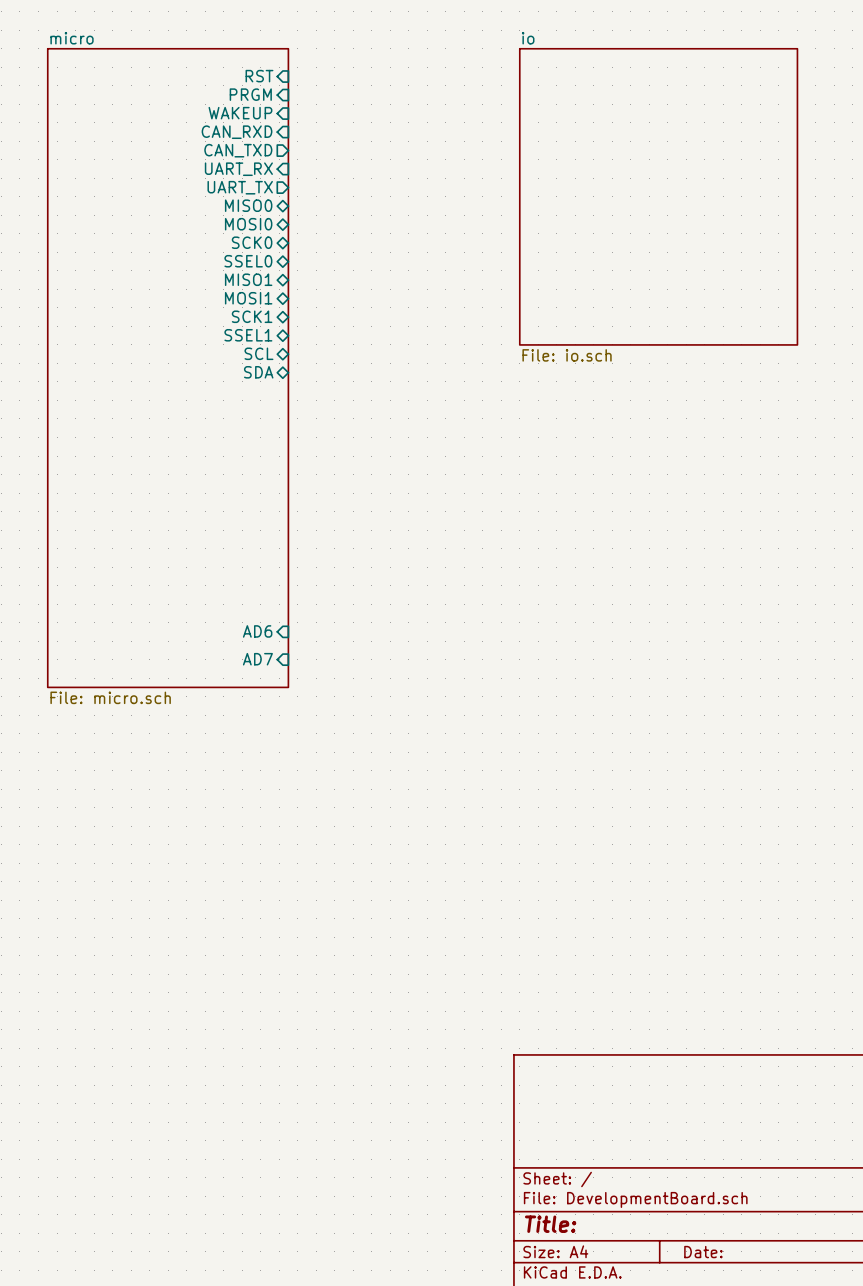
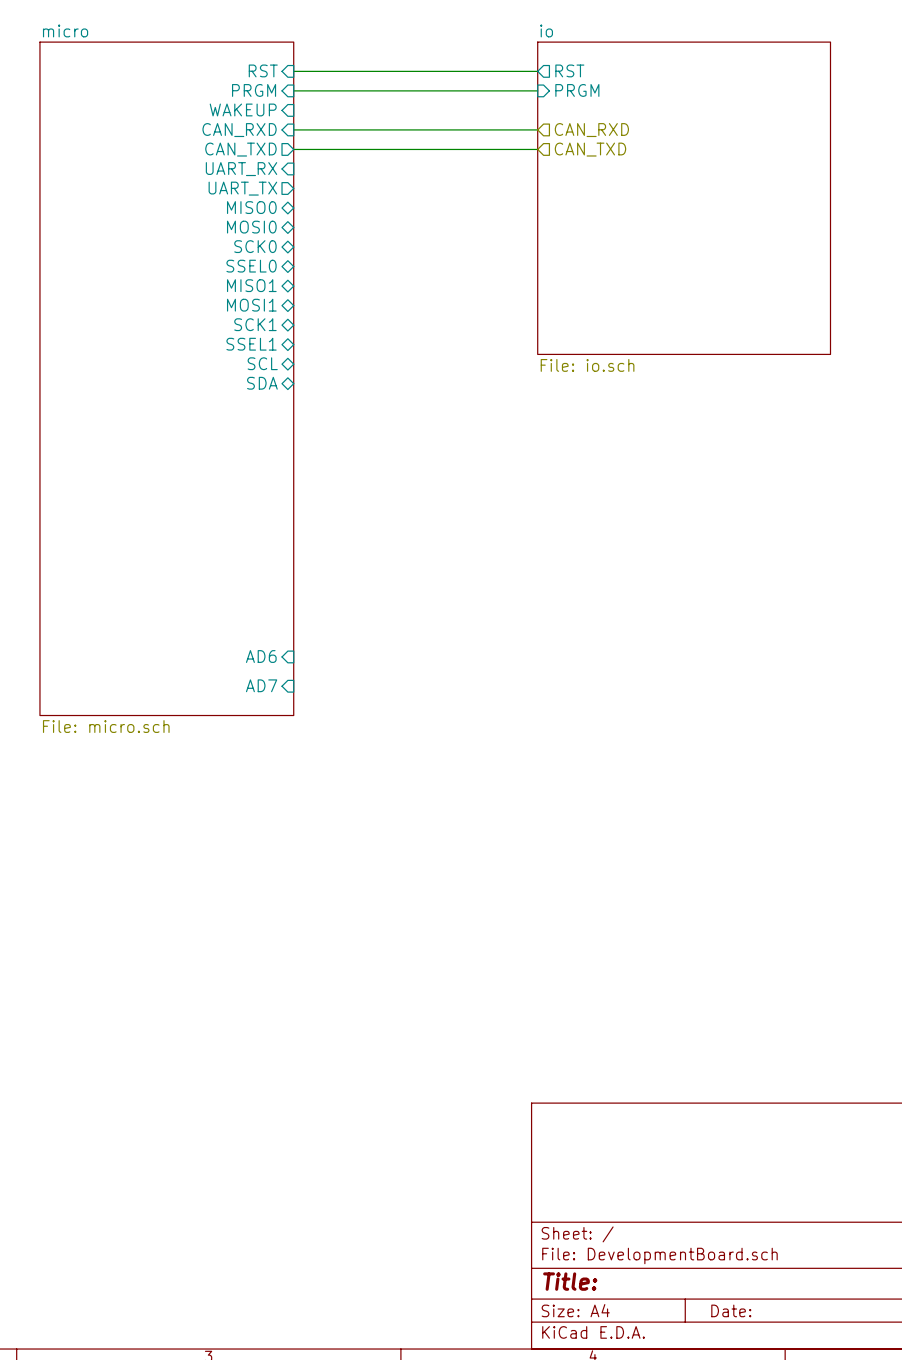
wire: none -> (293, 71) (537, 71)
sheet pin: none -> RST (569, 70)
sheet pin: none -> PRGM (577, 90)
wire: none -> (293, 90) (537, 90)
wire: none -> (293, 129) (537, 129)
hierarchical label: none -> CAN_RXD (591, 130)
wire: none -> (293, 149) (537, 149)
hierarchical label: none -> CAN_TXD (590, 149)

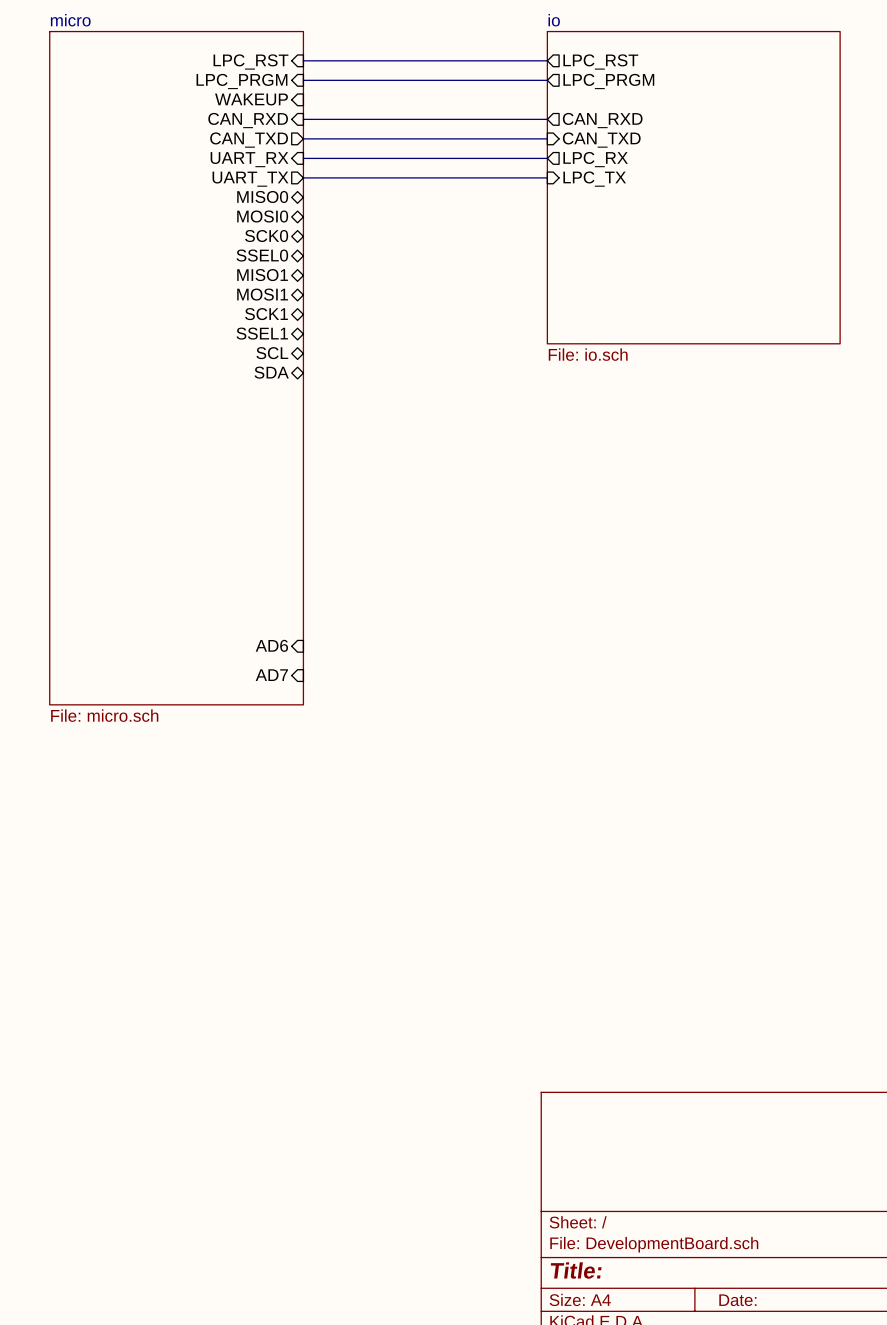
sheet pin: RST (263, 70) -> LPC_RST (250, 61)
sheet pin: RST (569, 70) -> LPC_RST (600, 61)
sheet pin: PRGM (254, 90) -> LPC_PRGM (241, 81)
sheet pin shape: input (577, 90) -> output (608, 81)
sheet pin: PRGM (577, 90) -> LPC_PRGM (608, 81)
sheet pin: none -> CAN_RXD (602, 120)
hierarchical label: CAN_RXD (591, 130) -> none
sheet pin: none -> CAN_TXD (601, 140)
hierarchical label: CAN_TXD (590, 149) -> none
wire: none -> (303, 158) (547, 158)
sheet pin: none -> LPC_RX (595, 159)
wire: none -> (303, 177) (547, 177)
sheet pin: none -> LPC_TX (594, 179)

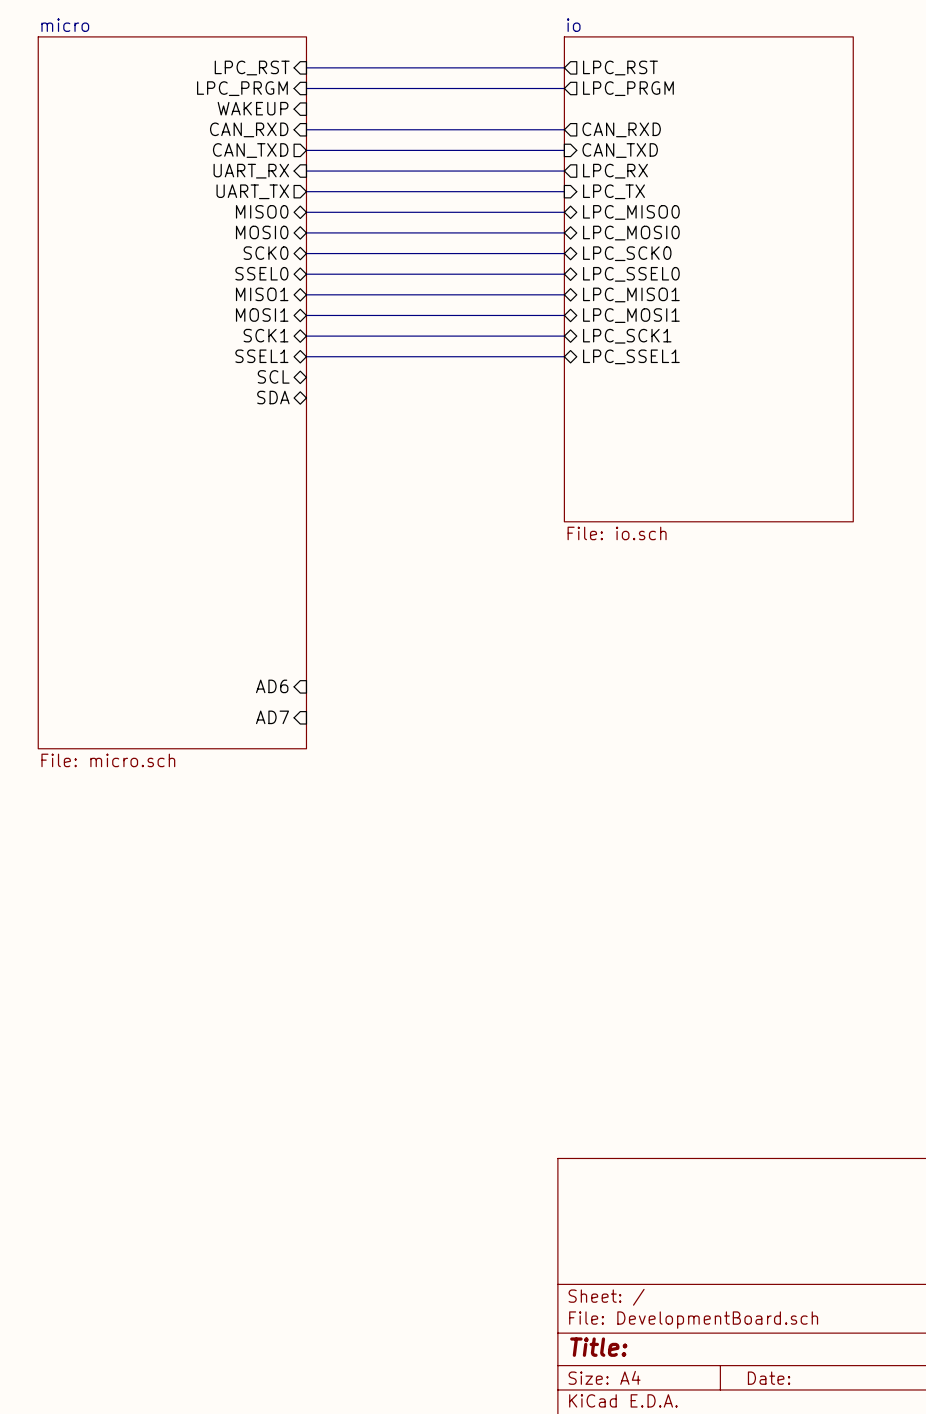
sheet io: File: io.sch (693, 187) -> none
wire: none -> (306, 212) (564, 212)
sheet pin: none -> LPC_MISO0 (631, 212)
wire: none -> (306, 232) (564, 232)
sheet pin: none -> LPC_MOSI0 (631, 233)
wire: none -> (306, 253) (564, 253)
sheet pin: none -> LPC_SCK0 (627, 253)
wire: none -> (306, 274) (564, 274)
sheet pin: none -> LPC_SSEL0 (631, 274)
sheet io: none -> File: io.sch (708, 279)
wire: none -> (306, 294) (564, 294)
sheet pin: none -> LPC_MISO1 (631, 294)
wire: none -> (306, 315) (564, 315)
sheet pin: none -> LPC_MOSI1 (631, 315)
wire: none -> (306, 336) (564, 336)
sheet pin: none -> LPC_SCK1 (627, 336)
wire: none -> (306, 356) (564, 356)
sheet pin: none -> LPC_SSEL1 (631, 356)

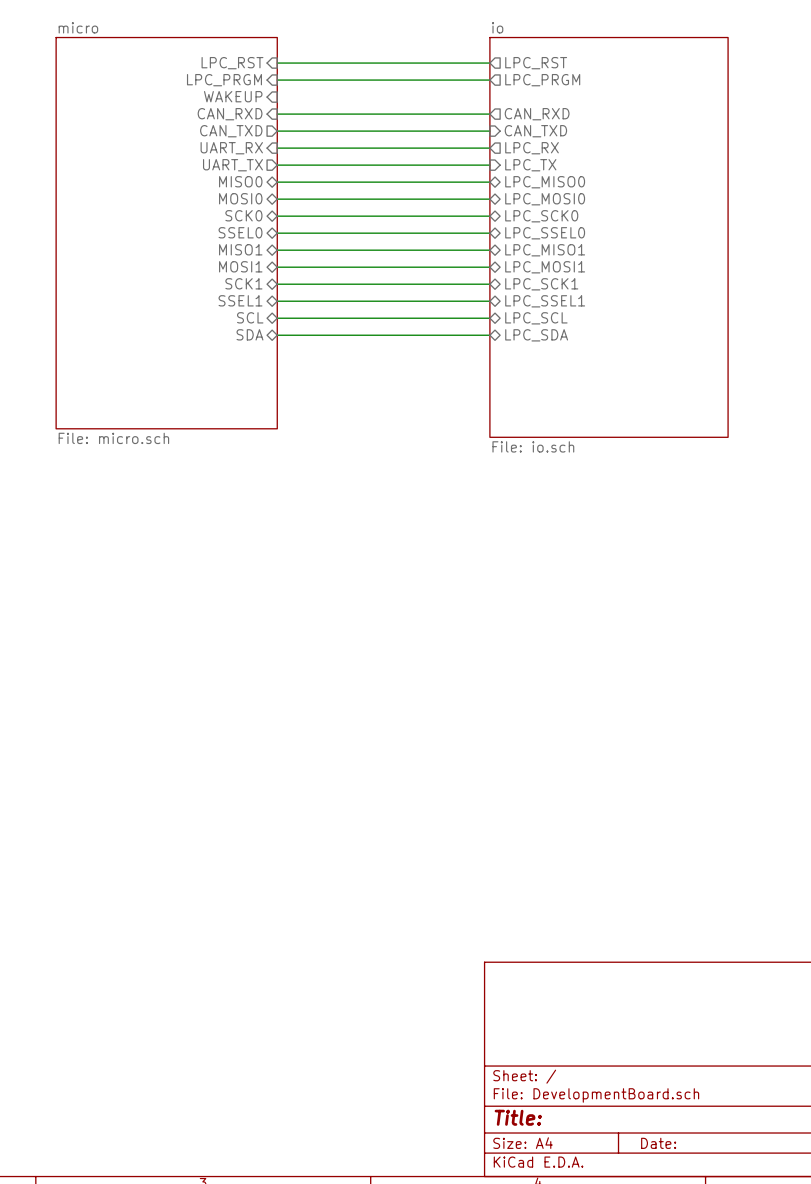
sheet micro: none -> File: micro.sch (166, 233)
wire: none -> (277, 318) (489, 318)
sheet pin: none -> LPC_SCL (536, 318)
sheet micro: File: micro.sch (172, 392) -> none
wire: none -> (277, 335) (489, 335)
sheet pin: none -> LPC_SDA (536, 335)
sheet pin: AD6 (272, 686) -> none
sheet pin: AD7 (272, 717) -> none

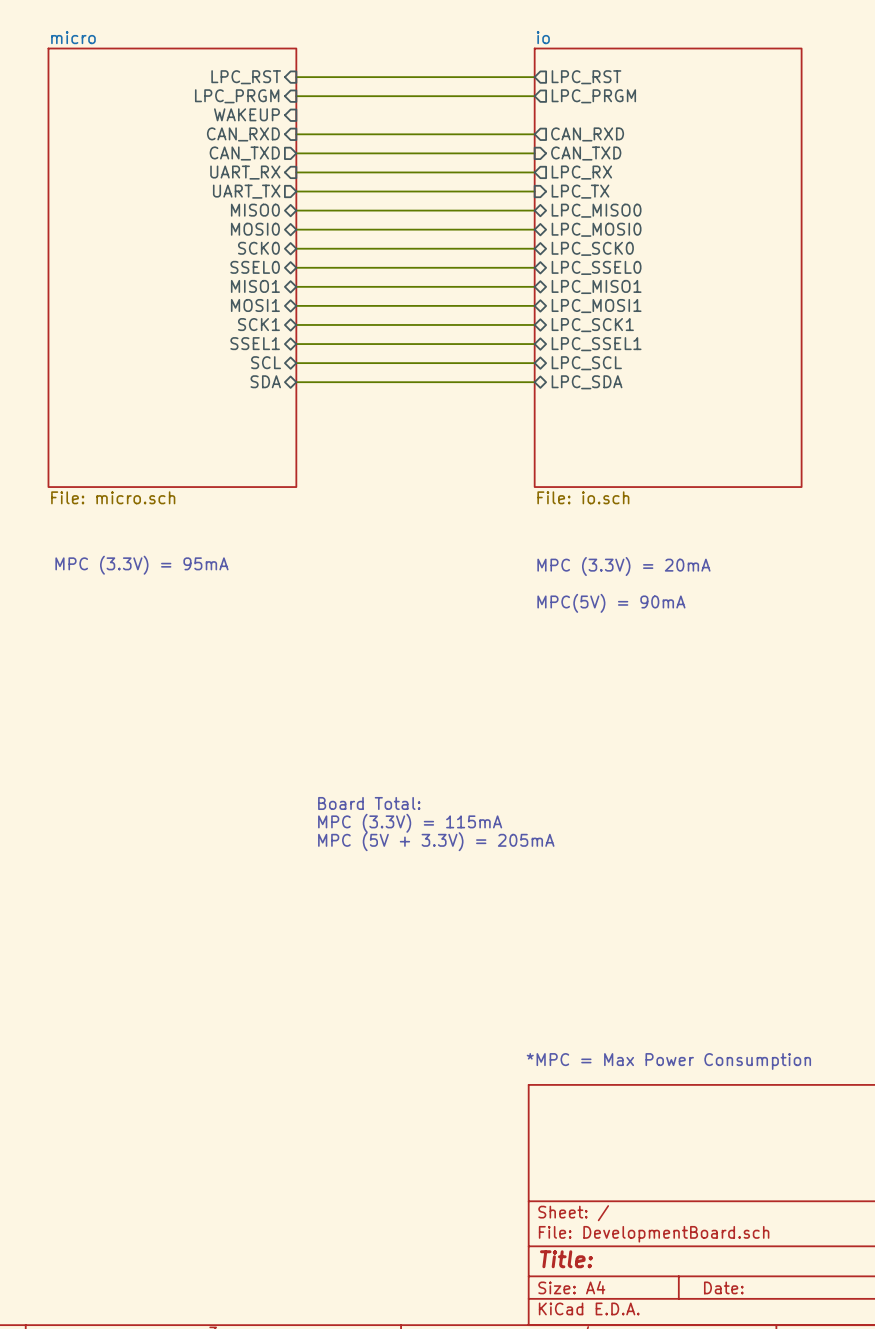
sheet io shape: [489, 37, 729, 438] -> [534, 48, 802, 488]
text: none -> MPC (3.3V) = 95mA (141, 565)
text: none -> MPC (3.3V) = 20mA (623, 566)
text: none -> MPC(5V) = 90mA (611, 603)
text: none -> Board Total: (369, 803)
text: none -> MPC (3.3V) = 115mA (410, 823)
text: none -> MPC (5V + 3.3V) = 205mA (436, 841)
text: none -> *MPC = Max Power Consumption (668, 1061)

